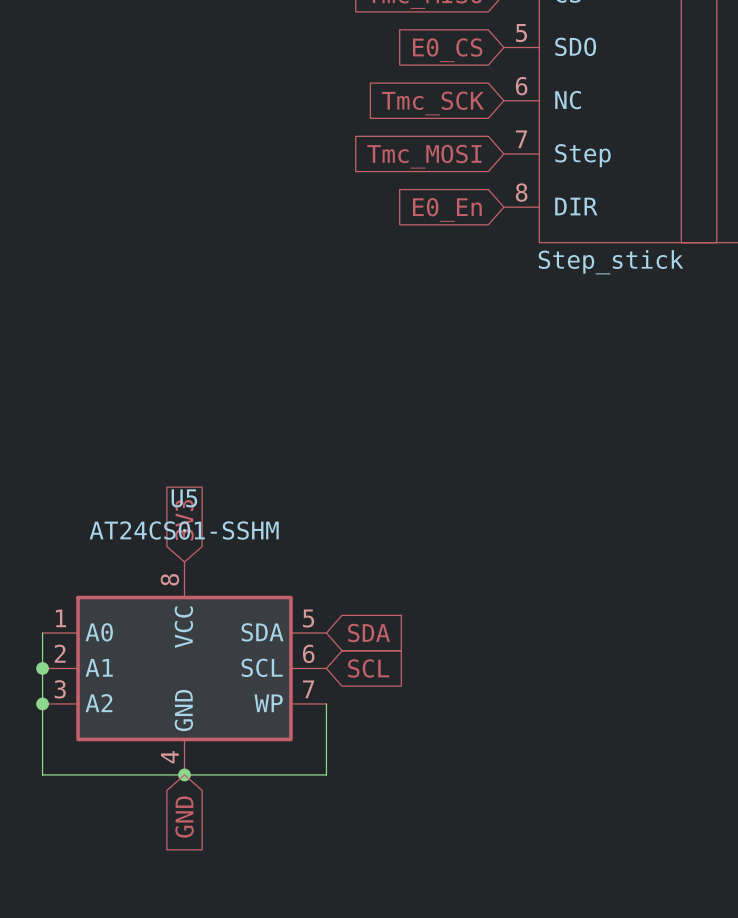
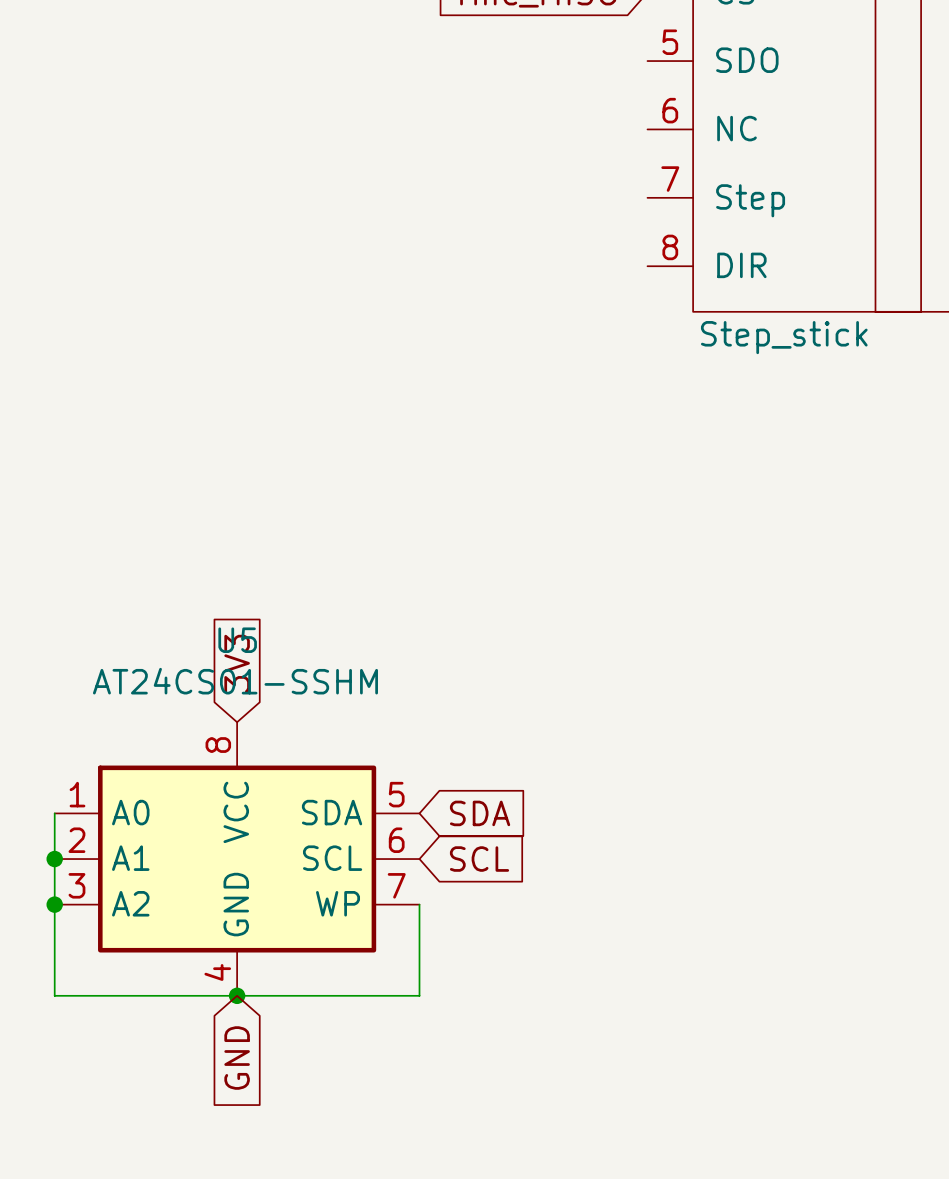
global label: E0_CS (447, 50) -> none
global label: Tmc_SCK (432, 103) -> none
global label: Tmc_MOSI (424, 156) -> none
global label: E0_En (447, 209) -> none

